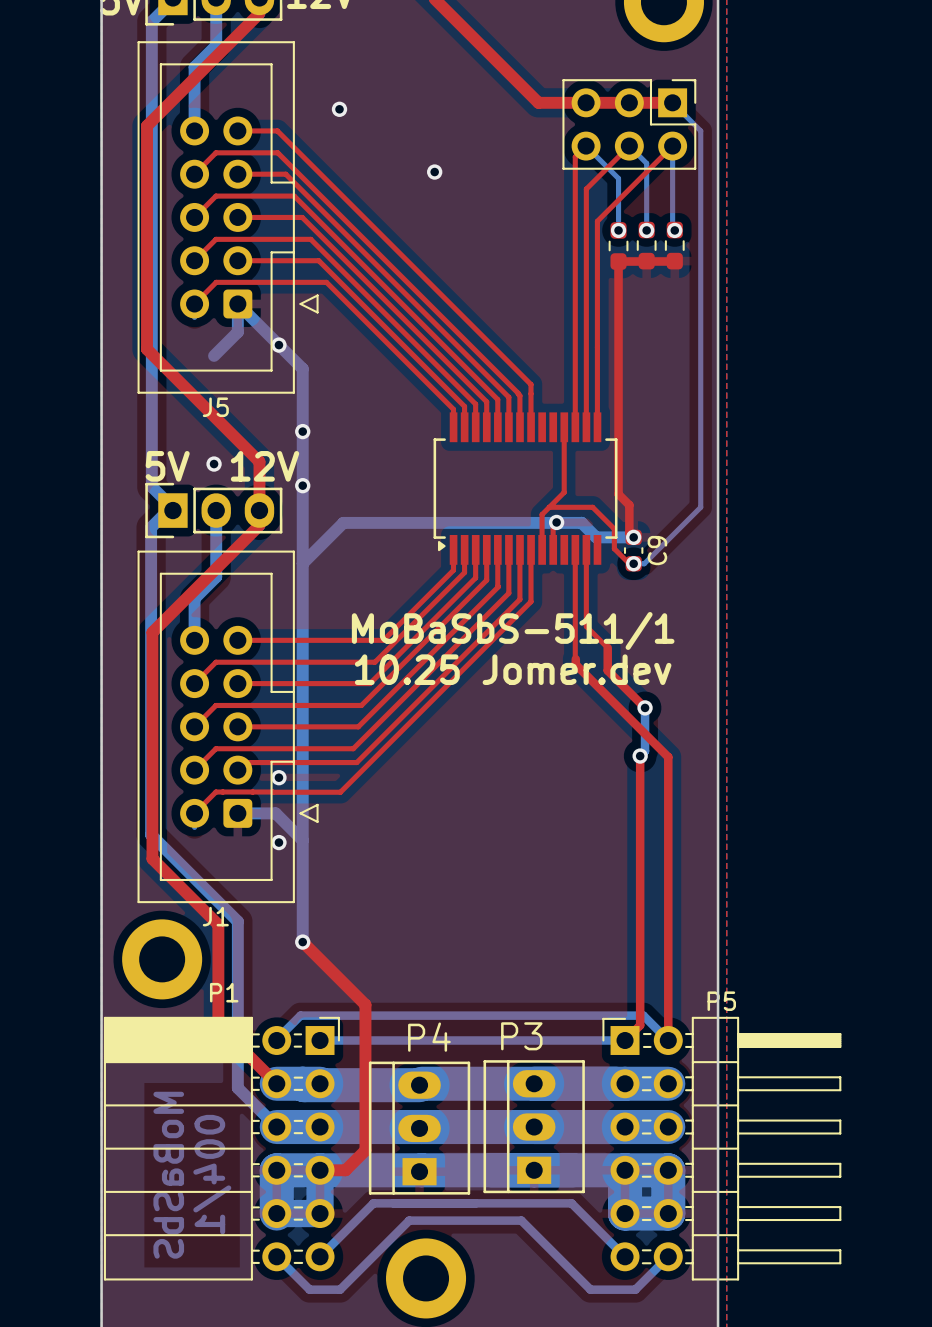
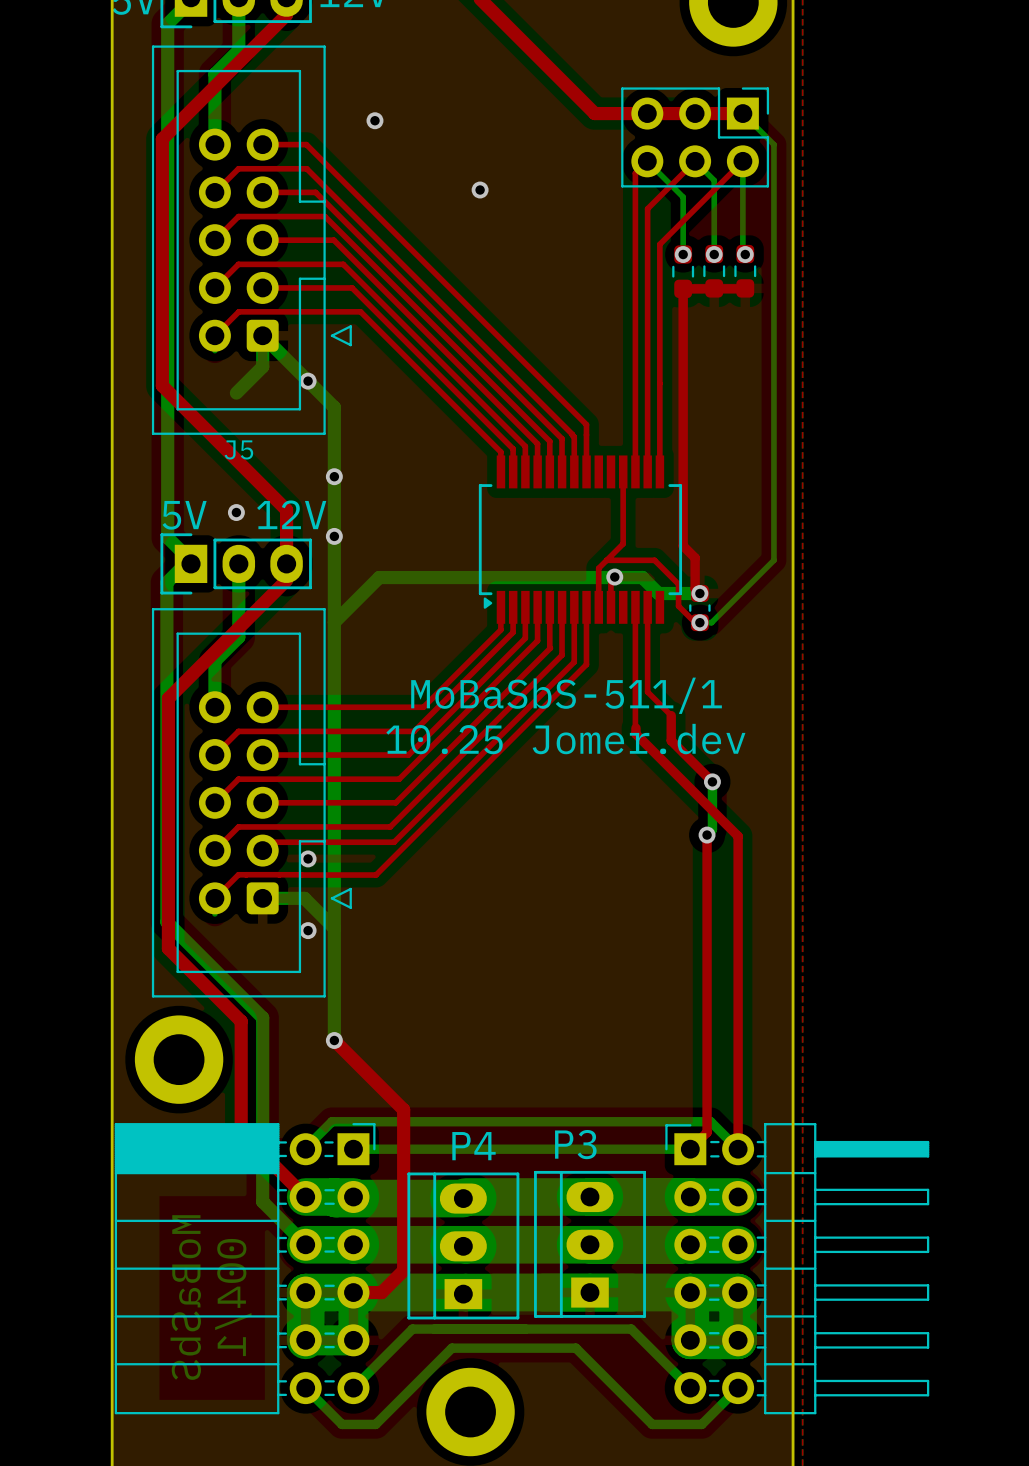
C9 name: C9 (657, 550) -> none
J1 name: J1 (215, 916) -> none
P1 name: P1 (224, 992) -> none
P5 name: P5 (721, 1001) -> none

